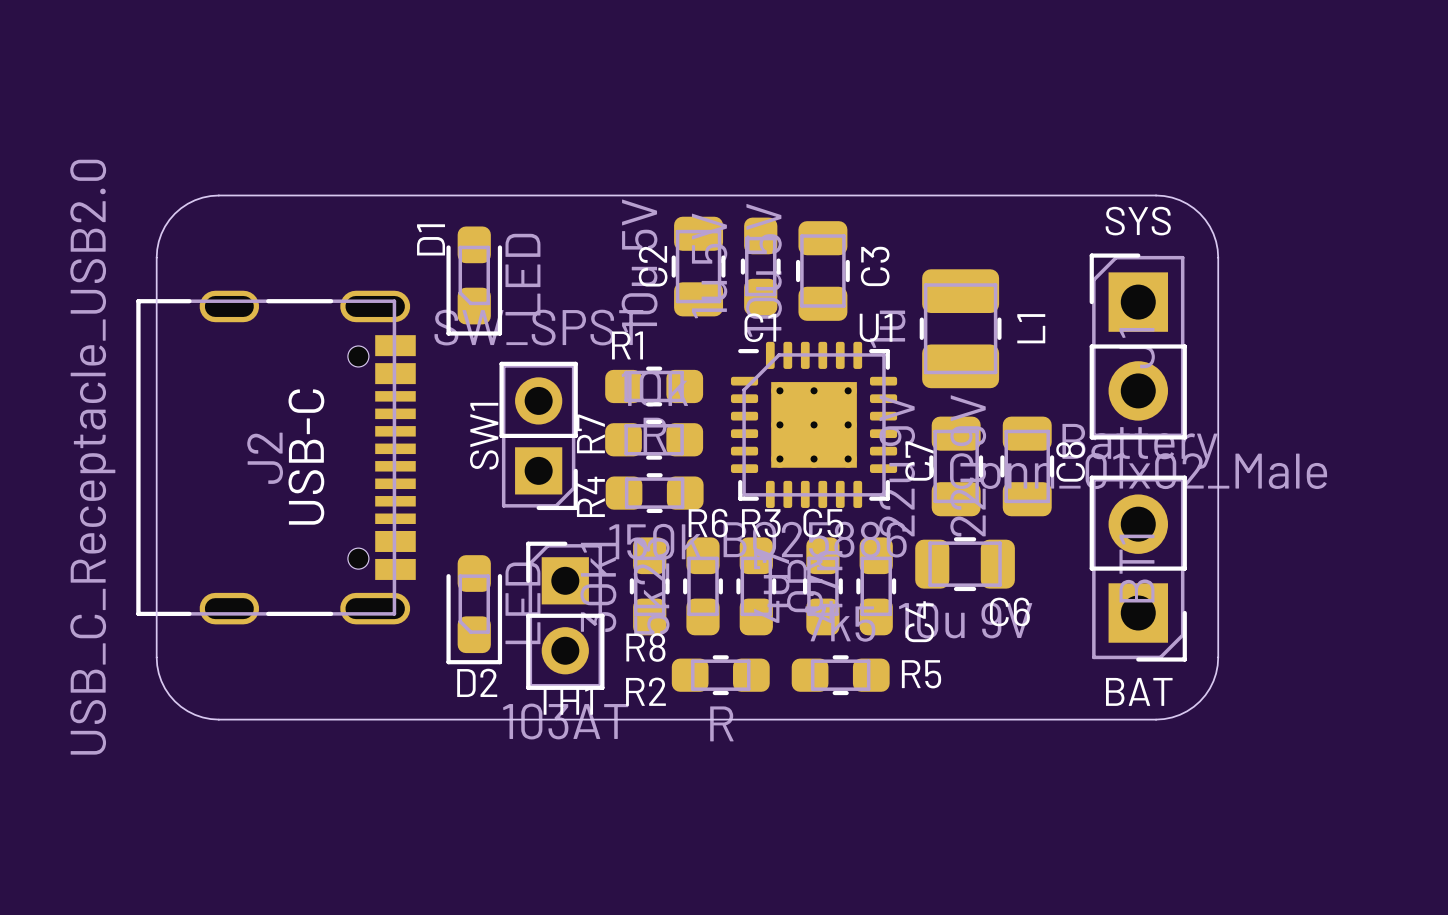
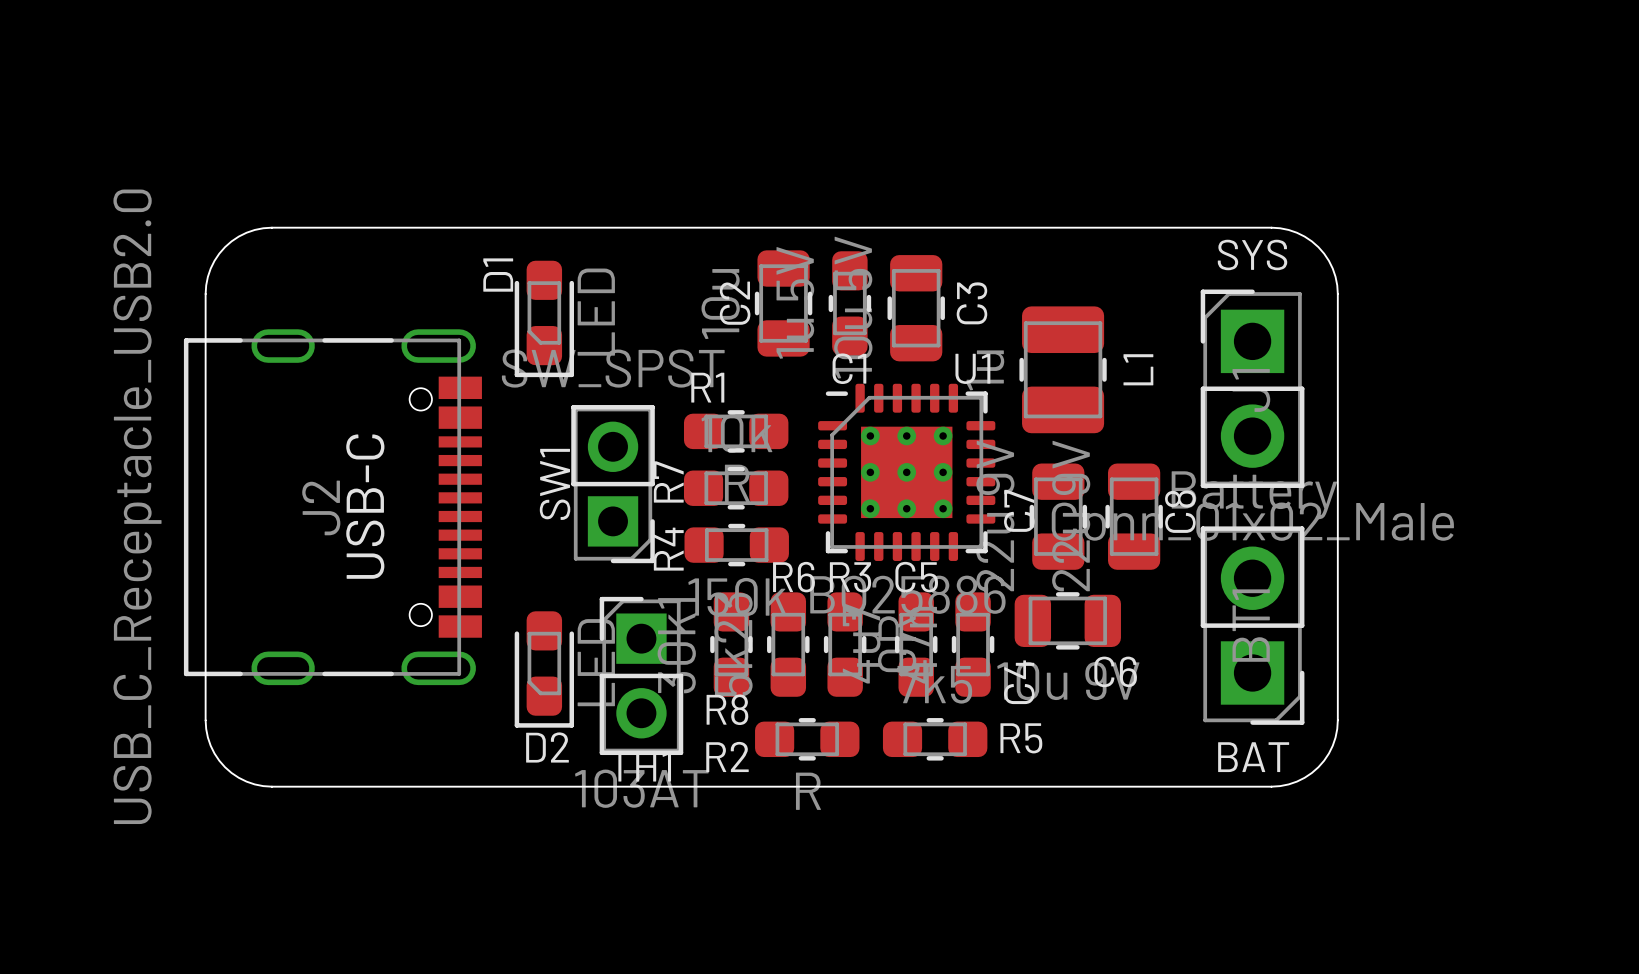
C2 value: 10u 5V (639, 265) -> 10u (720, 304)

